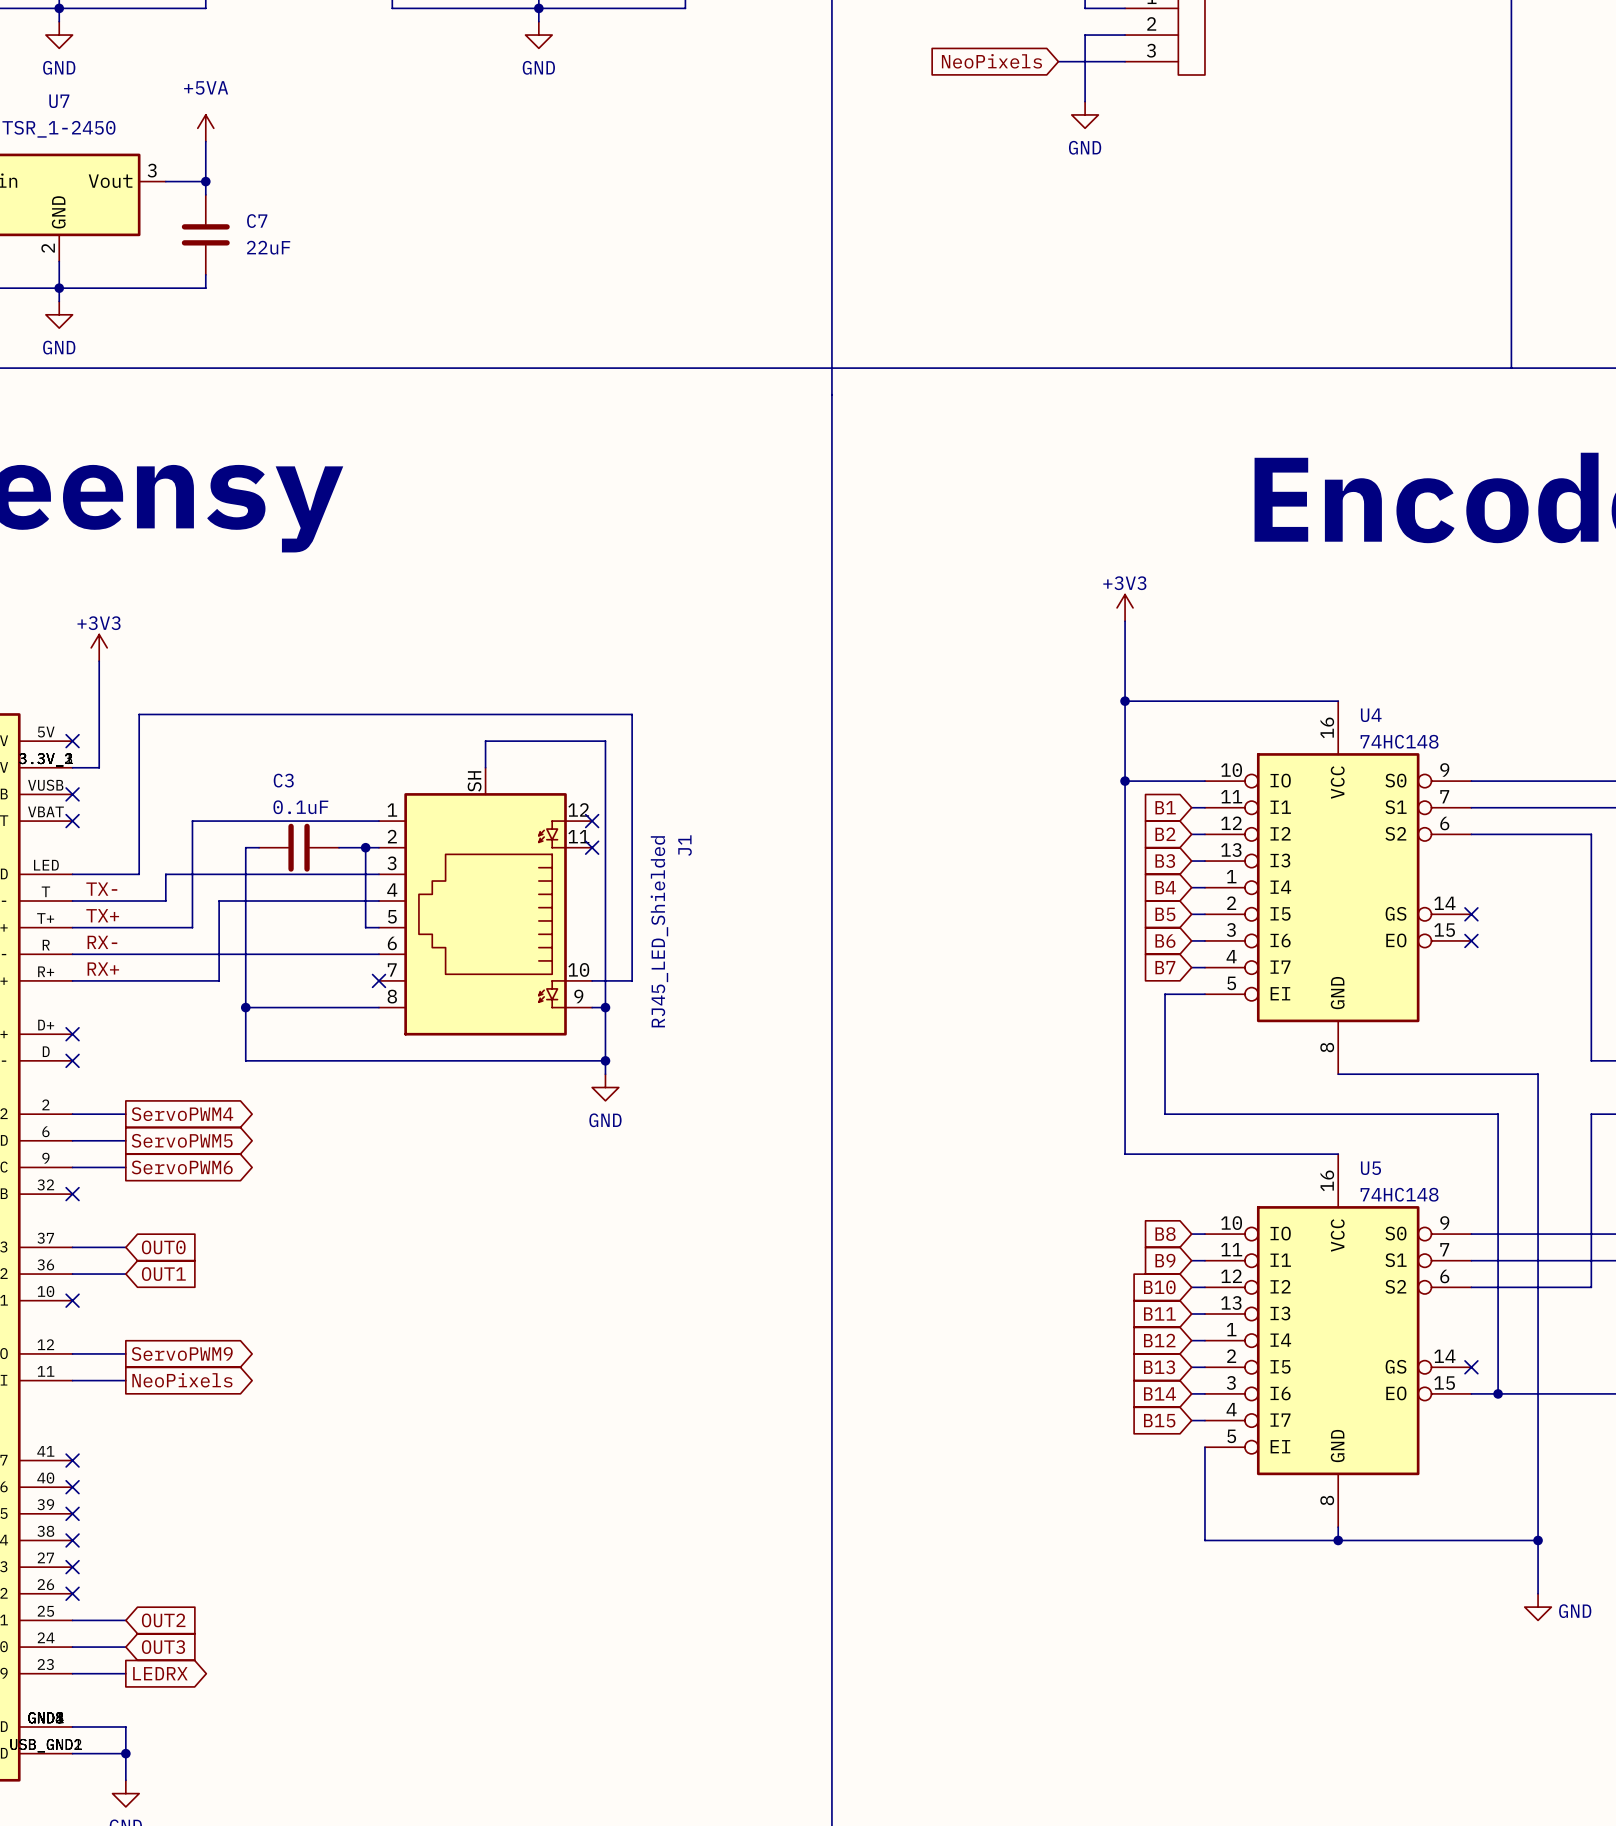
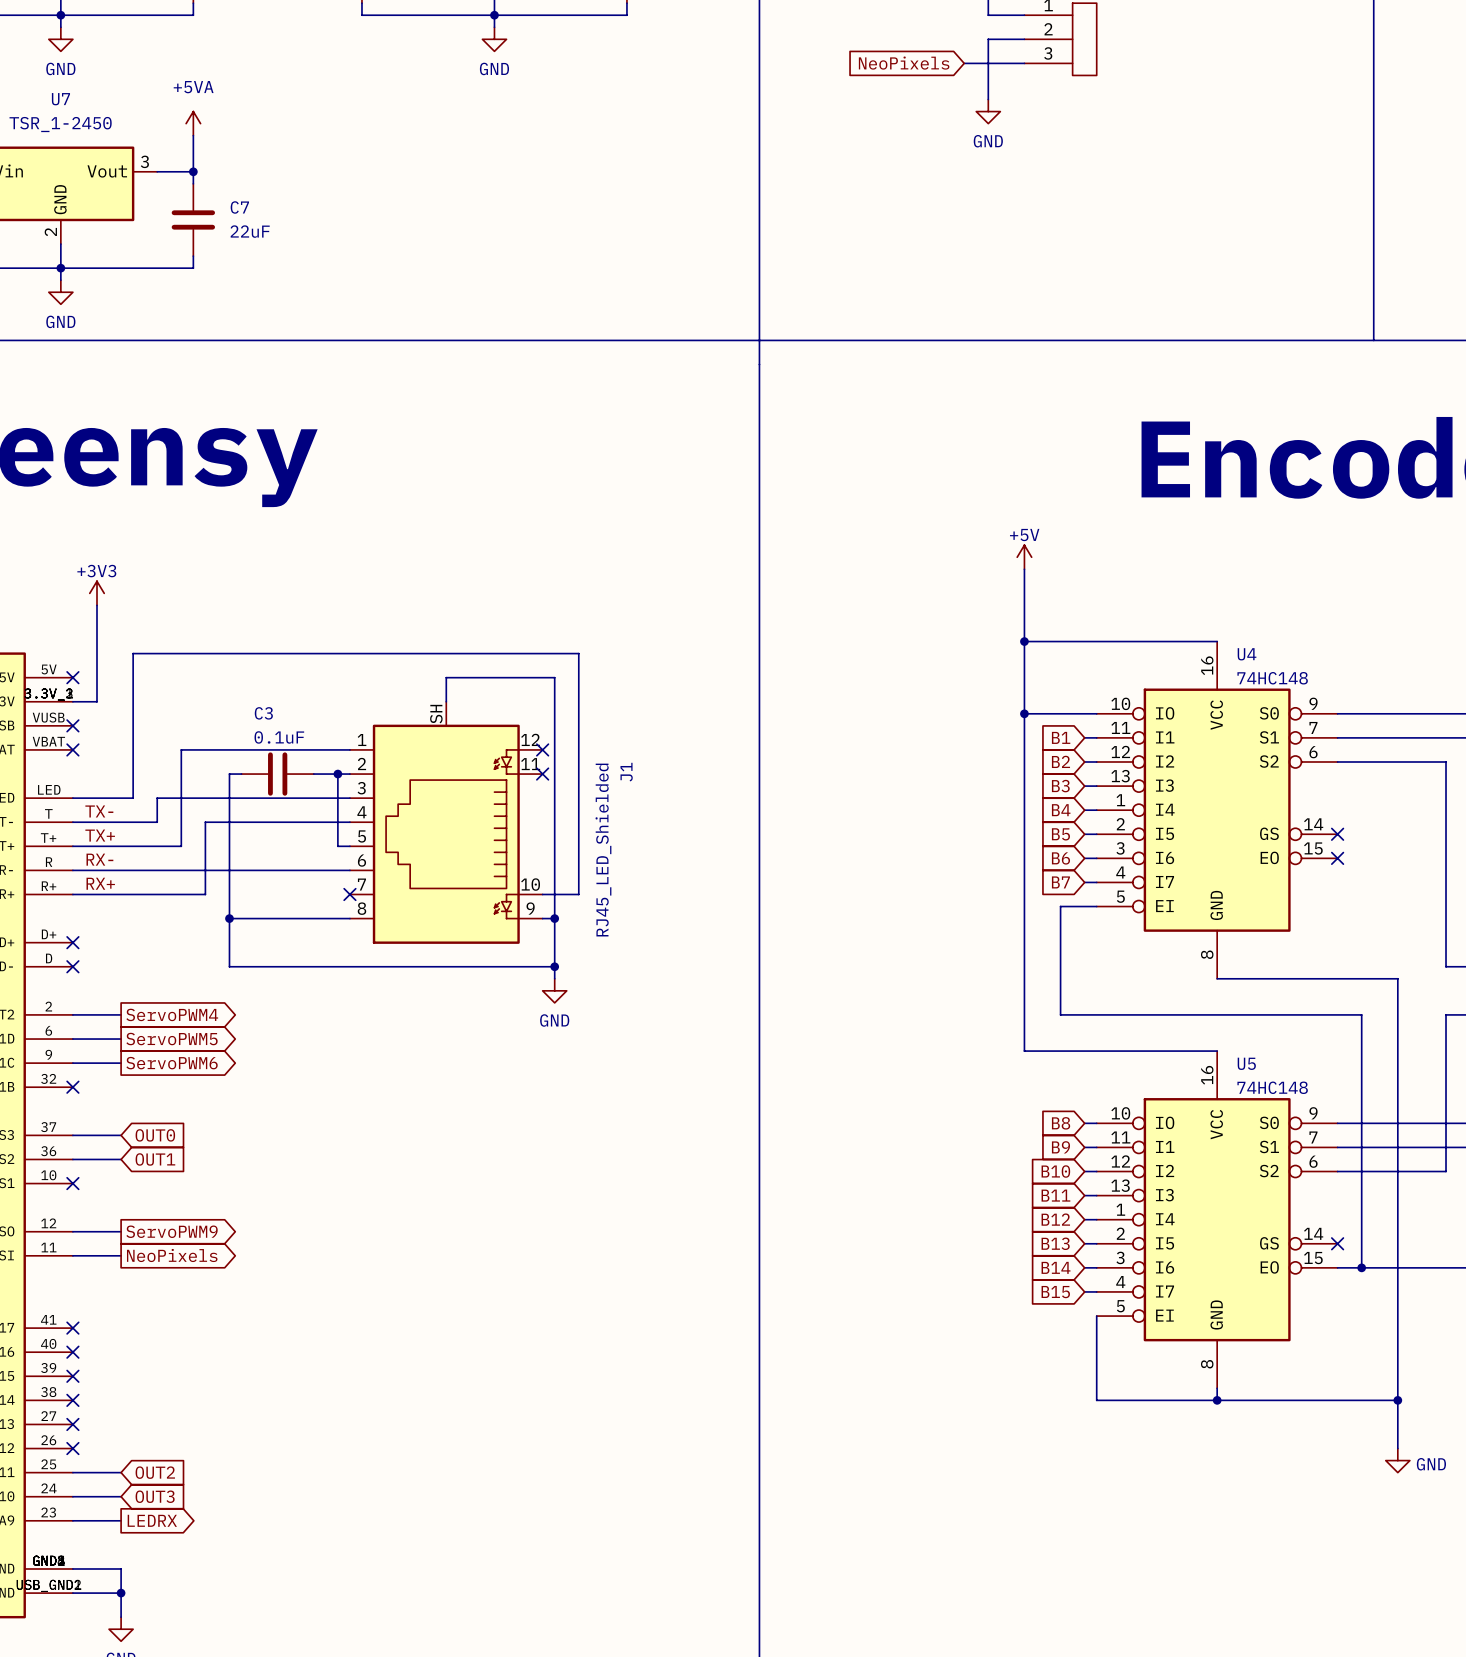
power symbol: +3V3 (1125, 607) -> +5V (1024, 557)

